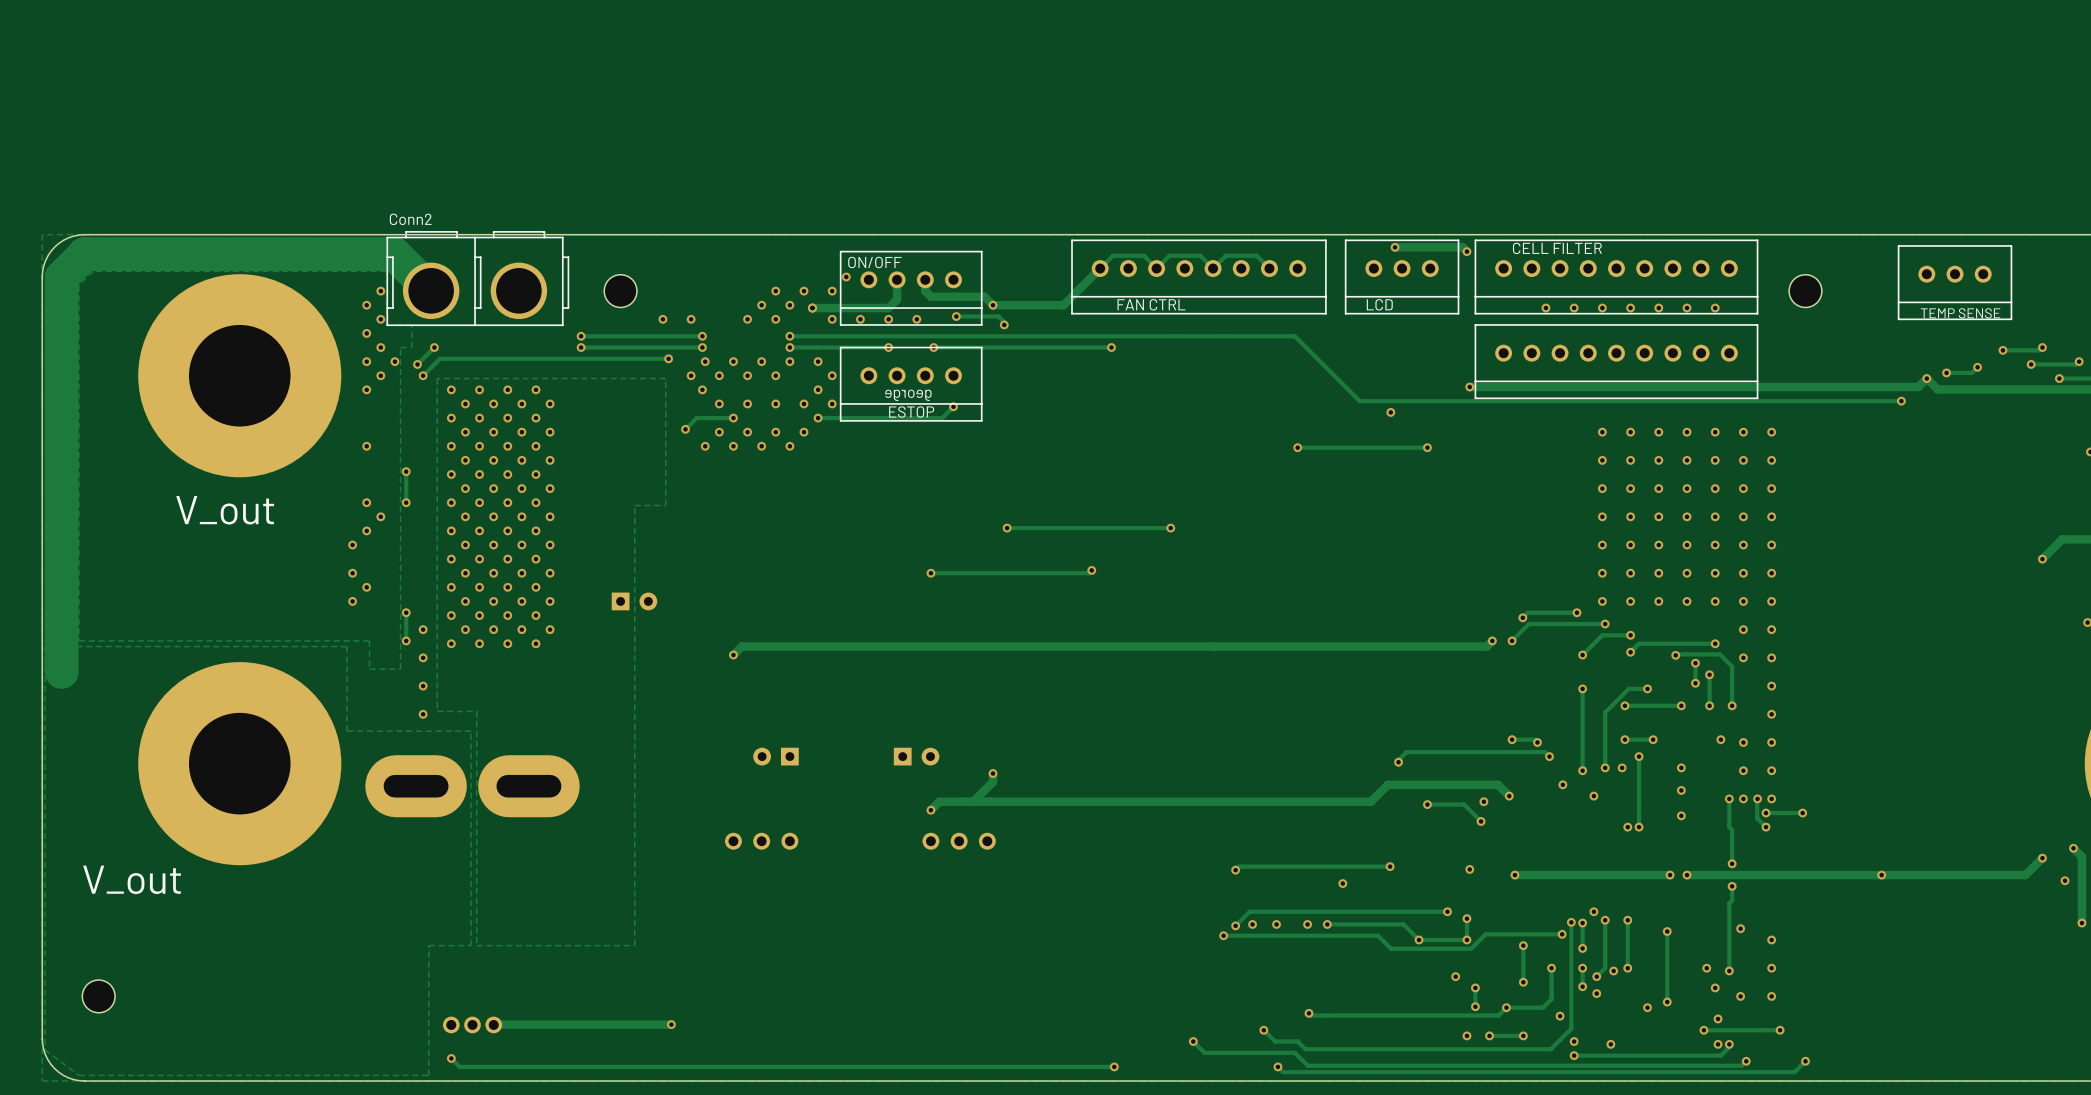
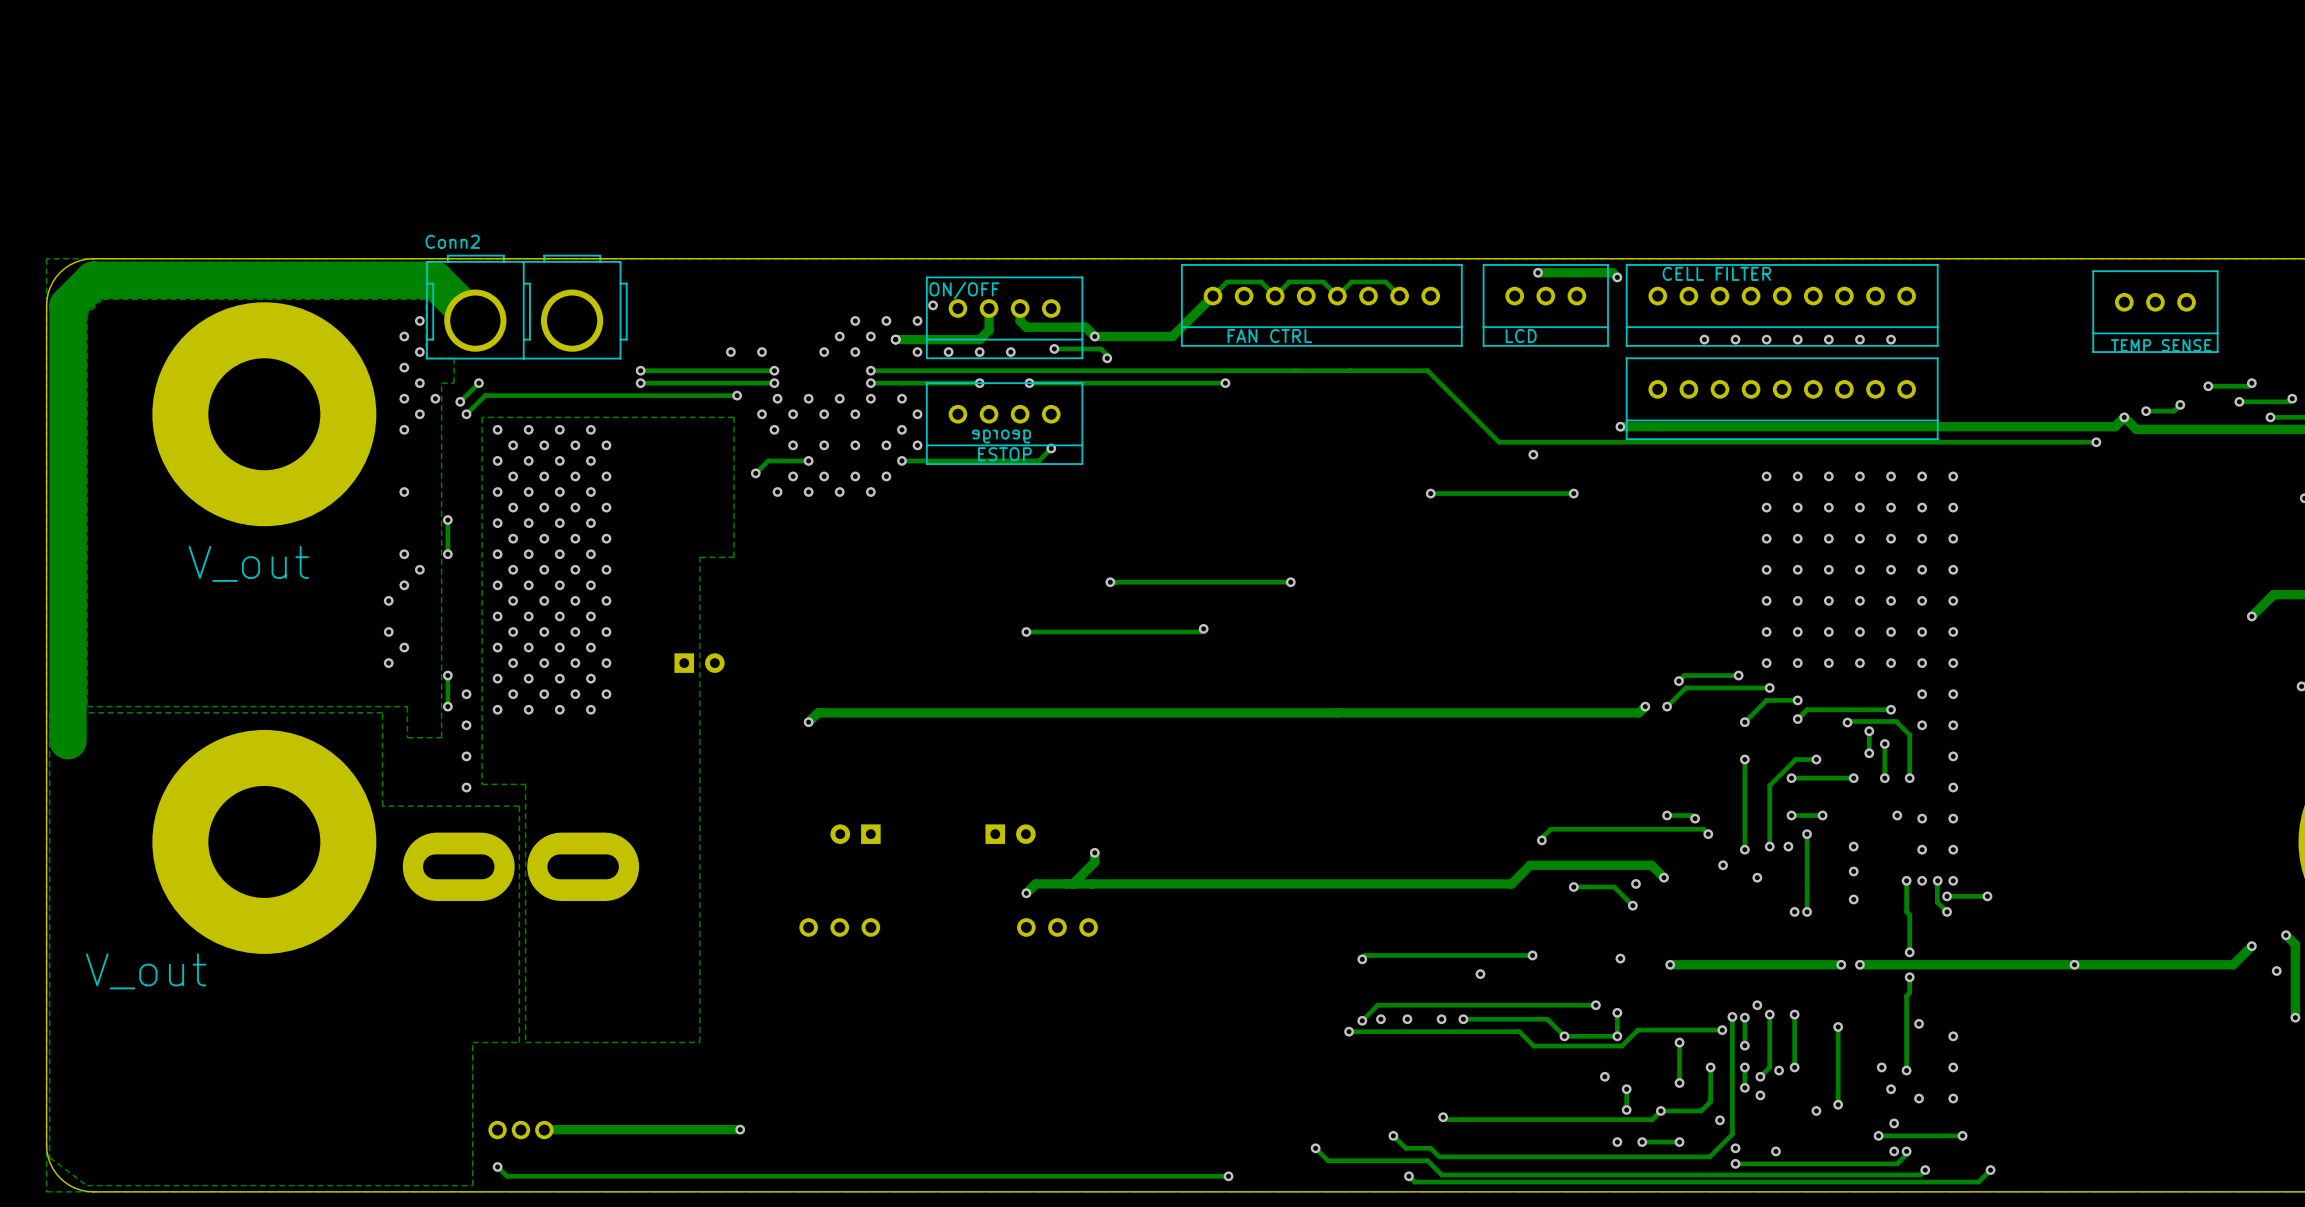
part: (620, 291) -> none
part: (1805, 291) -> none
part: (98, 996) -> none

